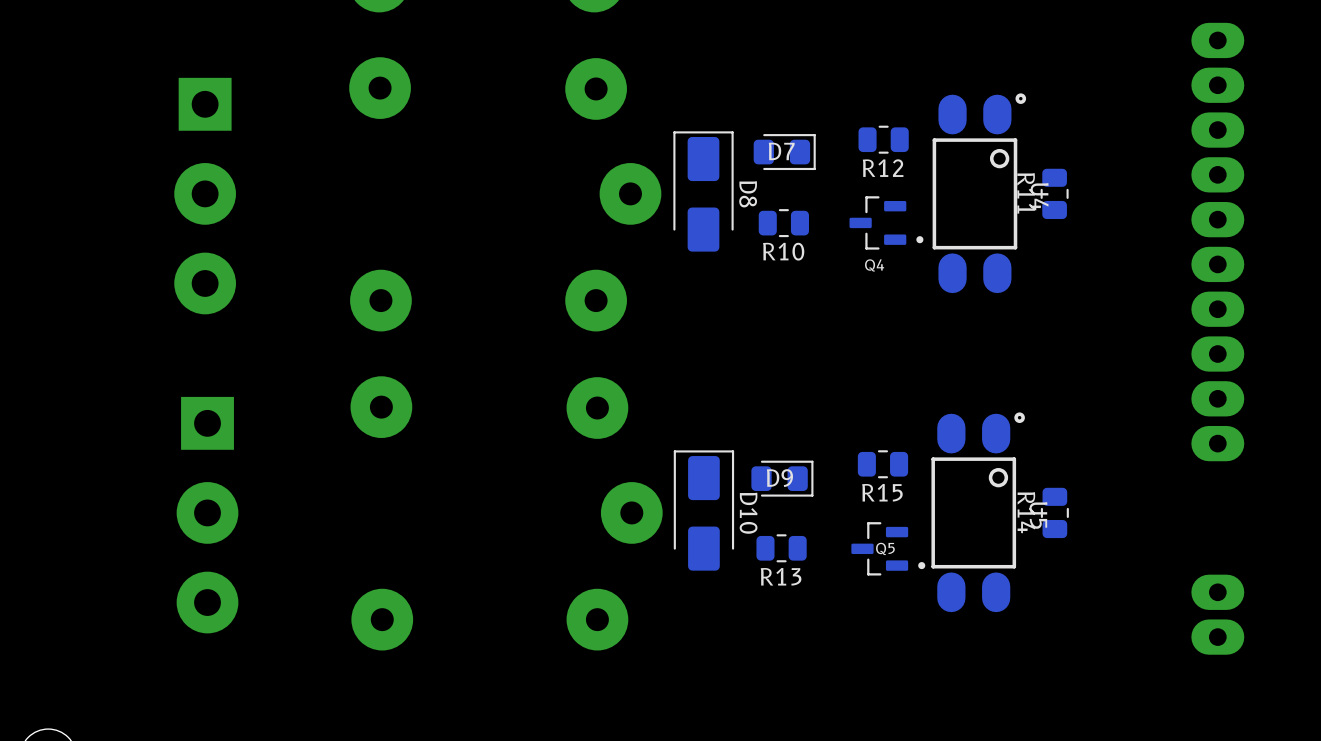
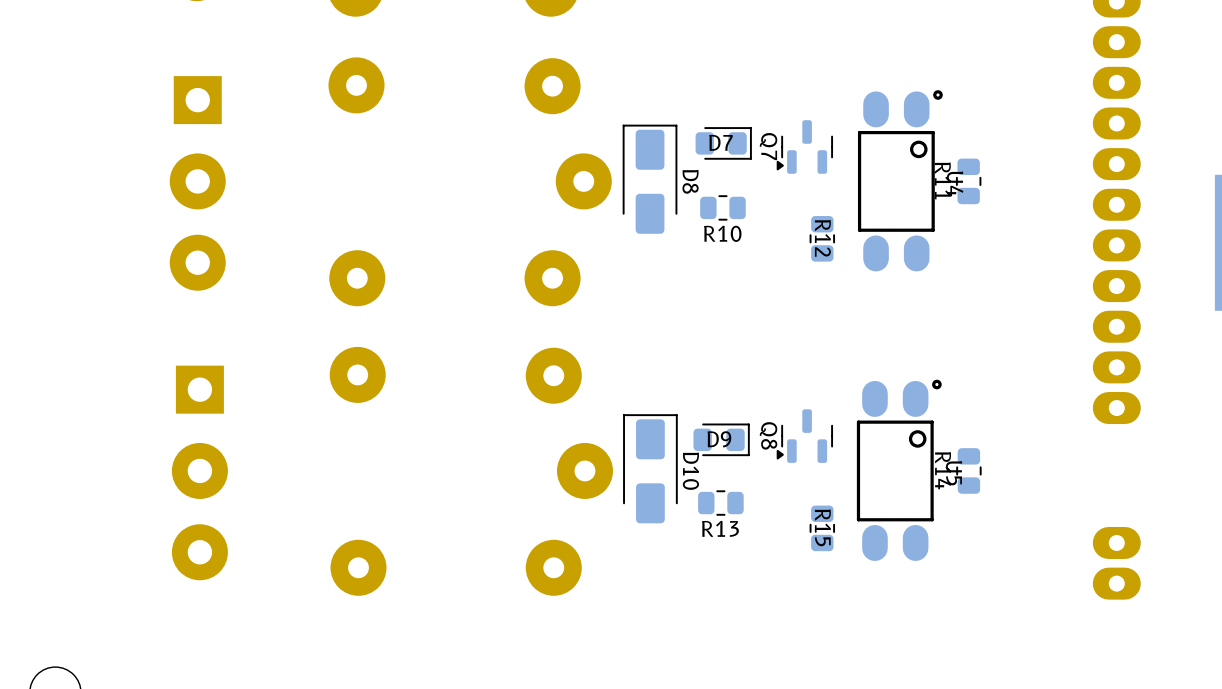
R12 rotation: 0° (883, 139) -> 90° clockwise (822, 238)
R12 position: (883, 139) -> (822, 238)
Q7: none -> (804, 146)
Q4: (886, 222) -> none
R15 rotation: 0° (882, 464) -> 90° clockwise (822, 528)
R15 position: (882, 464) -> (822, 528)
Q8: none -> (804, 436)
Q5: (888, 548) -> none

